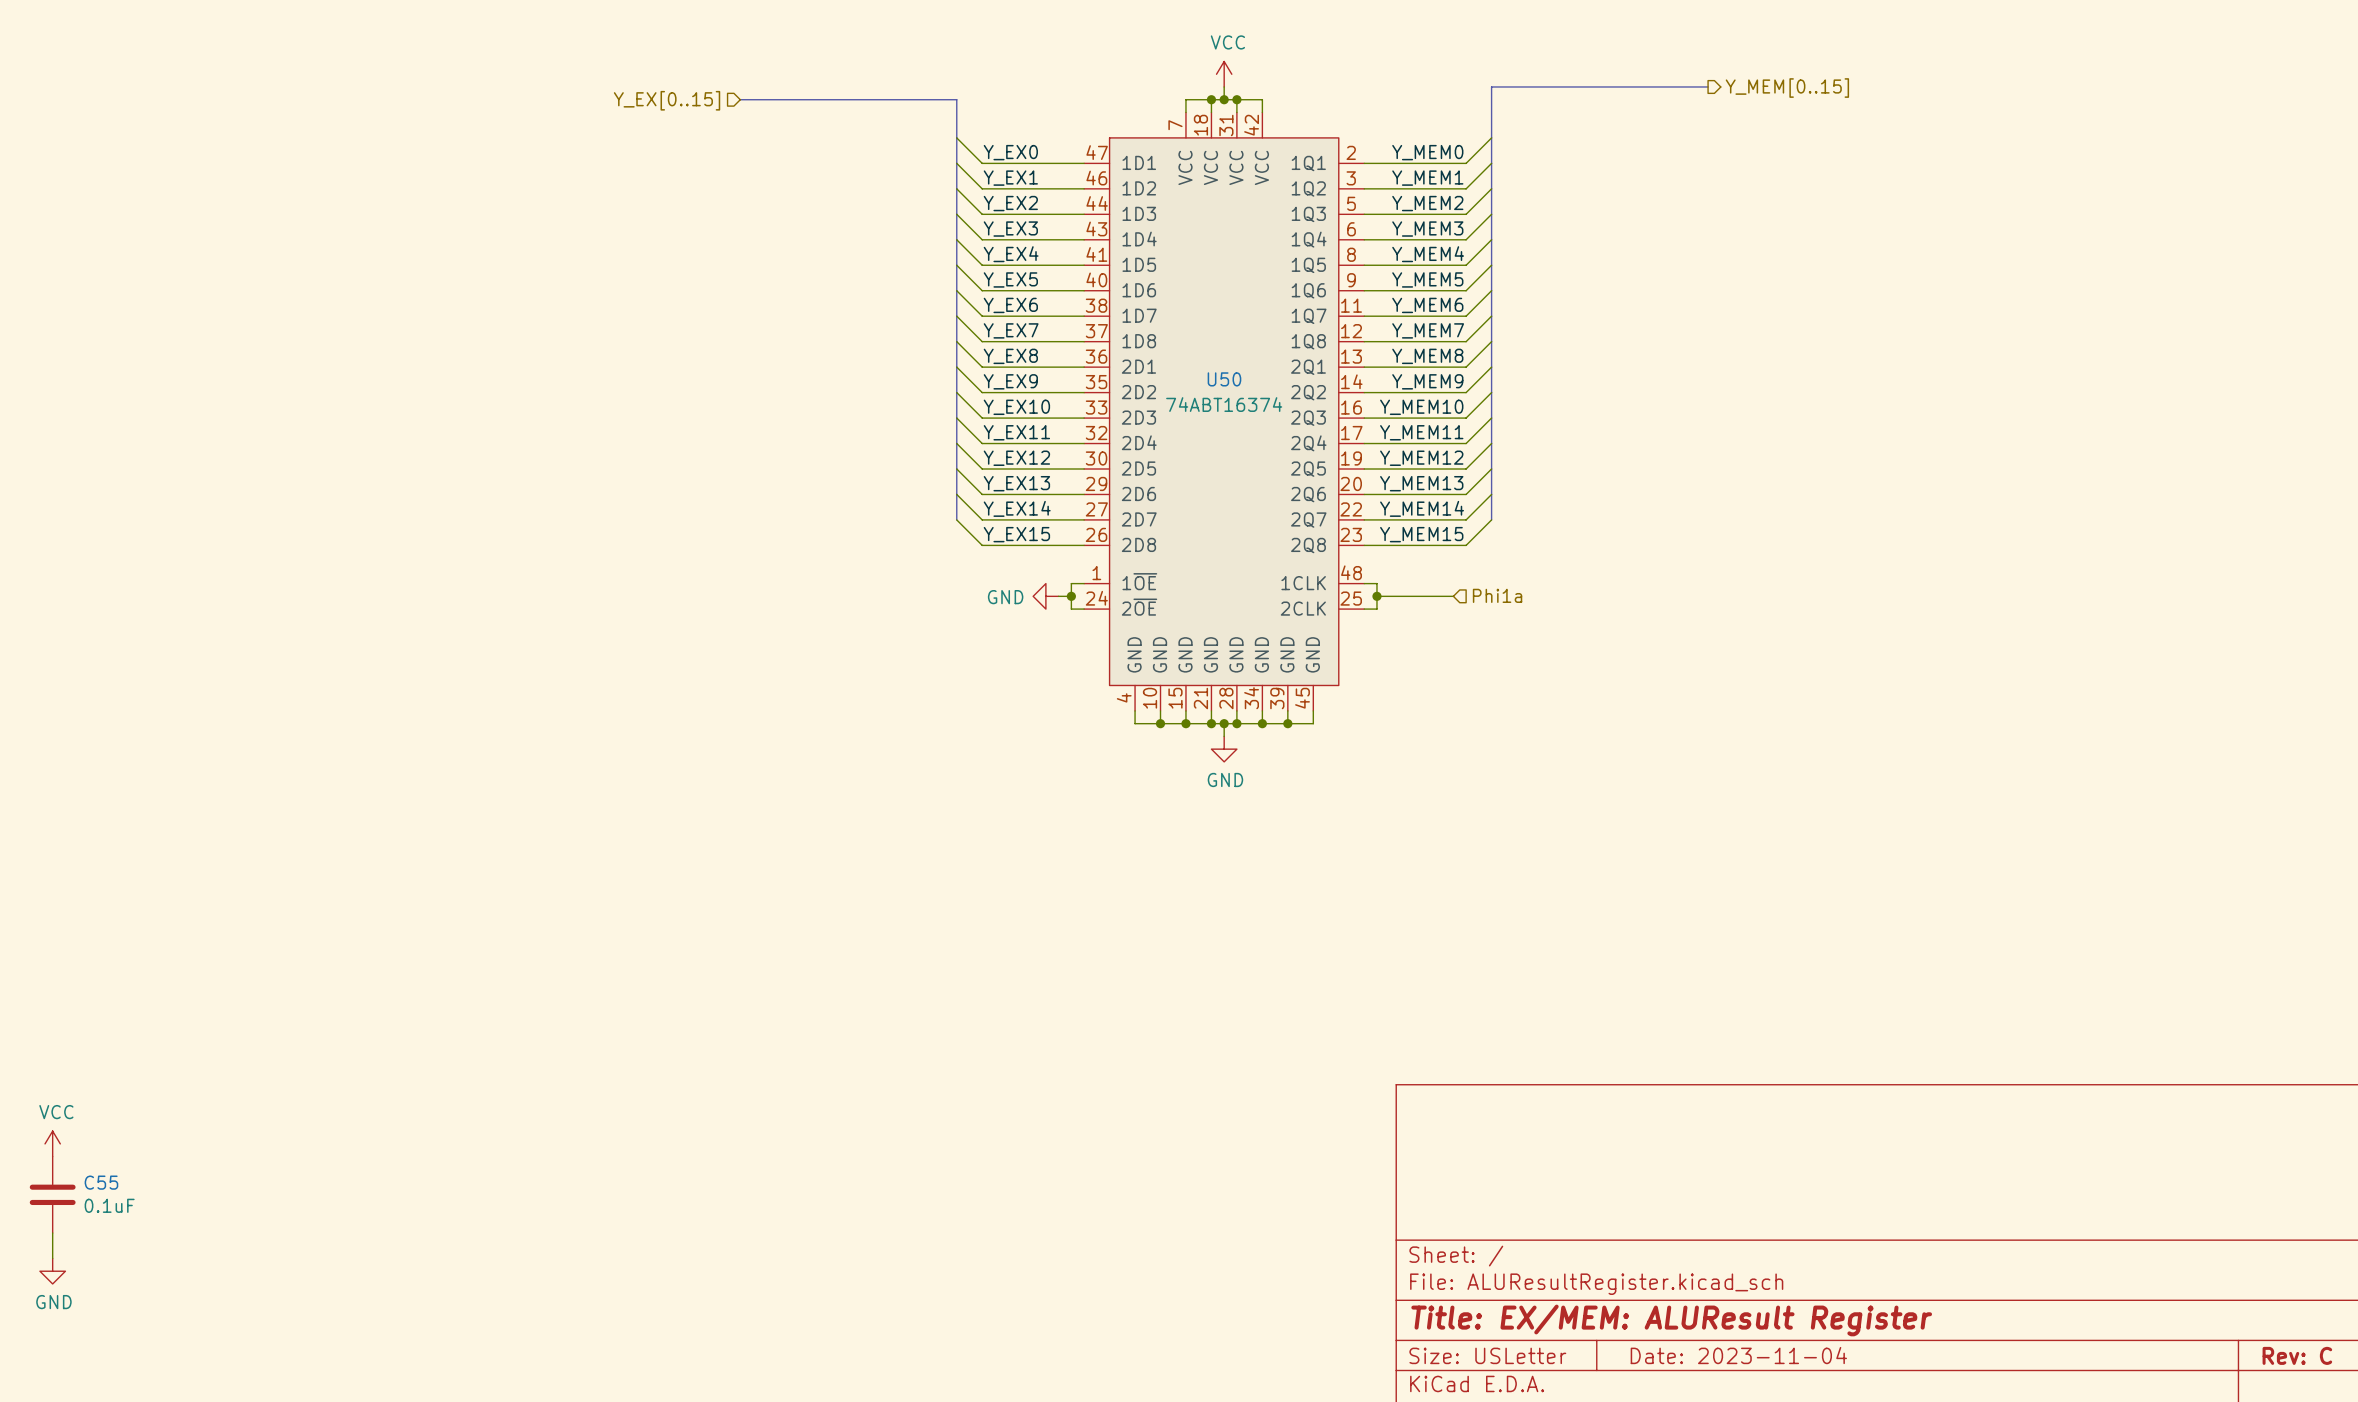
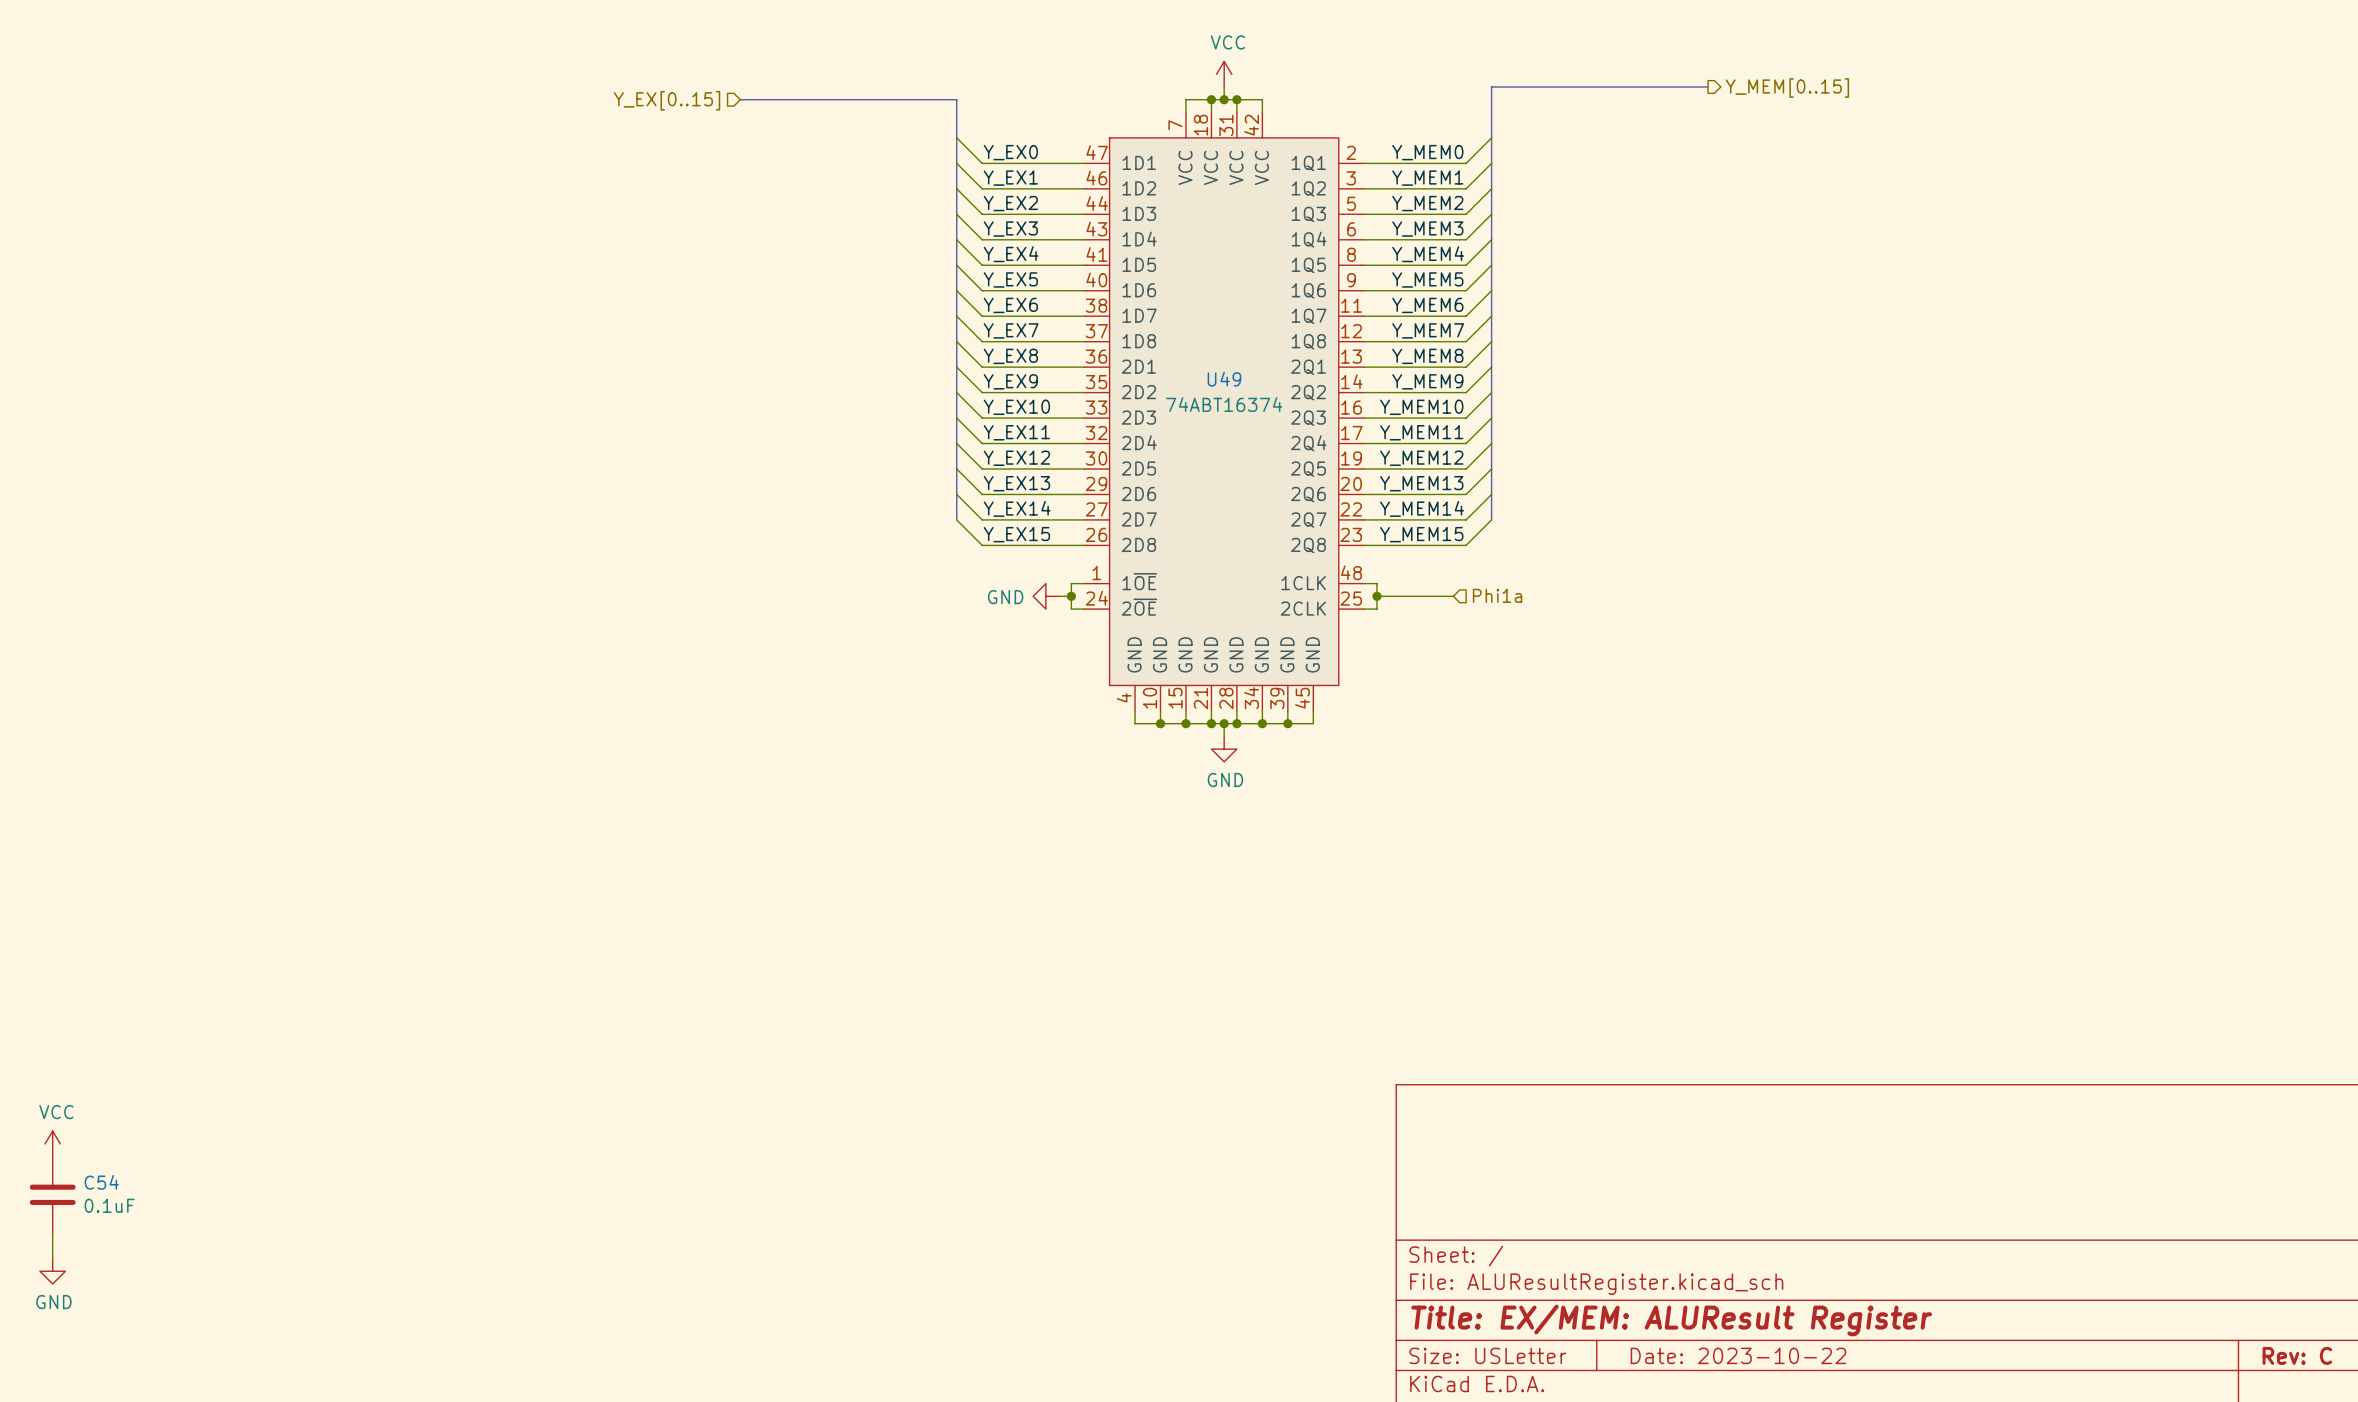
U50 name: U50 (1224, 379) -> U49 (1224, 379)
C55 name: C55 (101, 1182) -> C54 (101, 1182)
title block: Date: 2023-11-04 (1738, 1355) -> Date: 2023-10-22 (1738, 1355)

